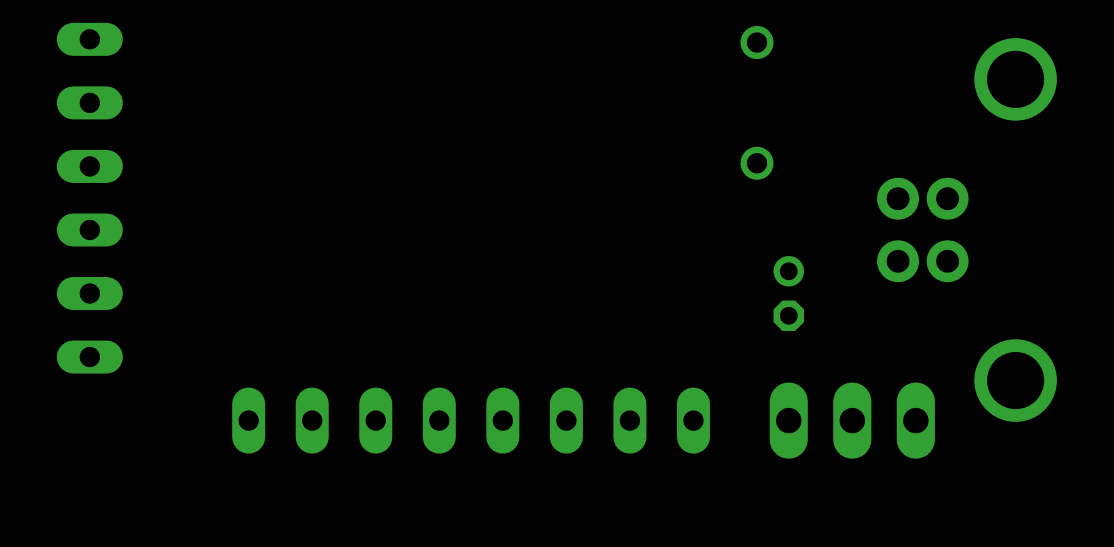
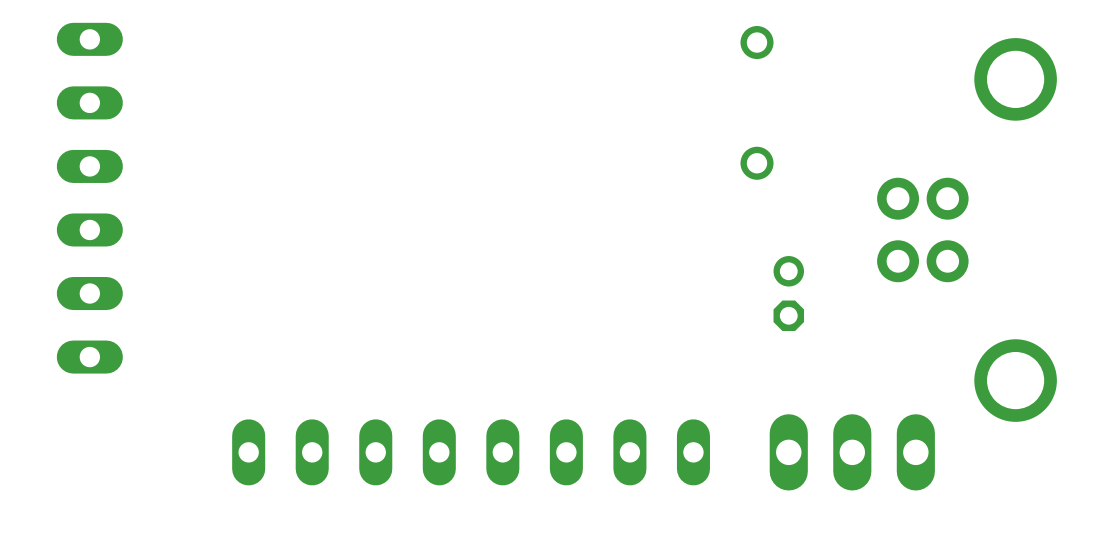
part position: (471, 420) -> (471, 452)
part position: (852, 420) -> (852, 452)

